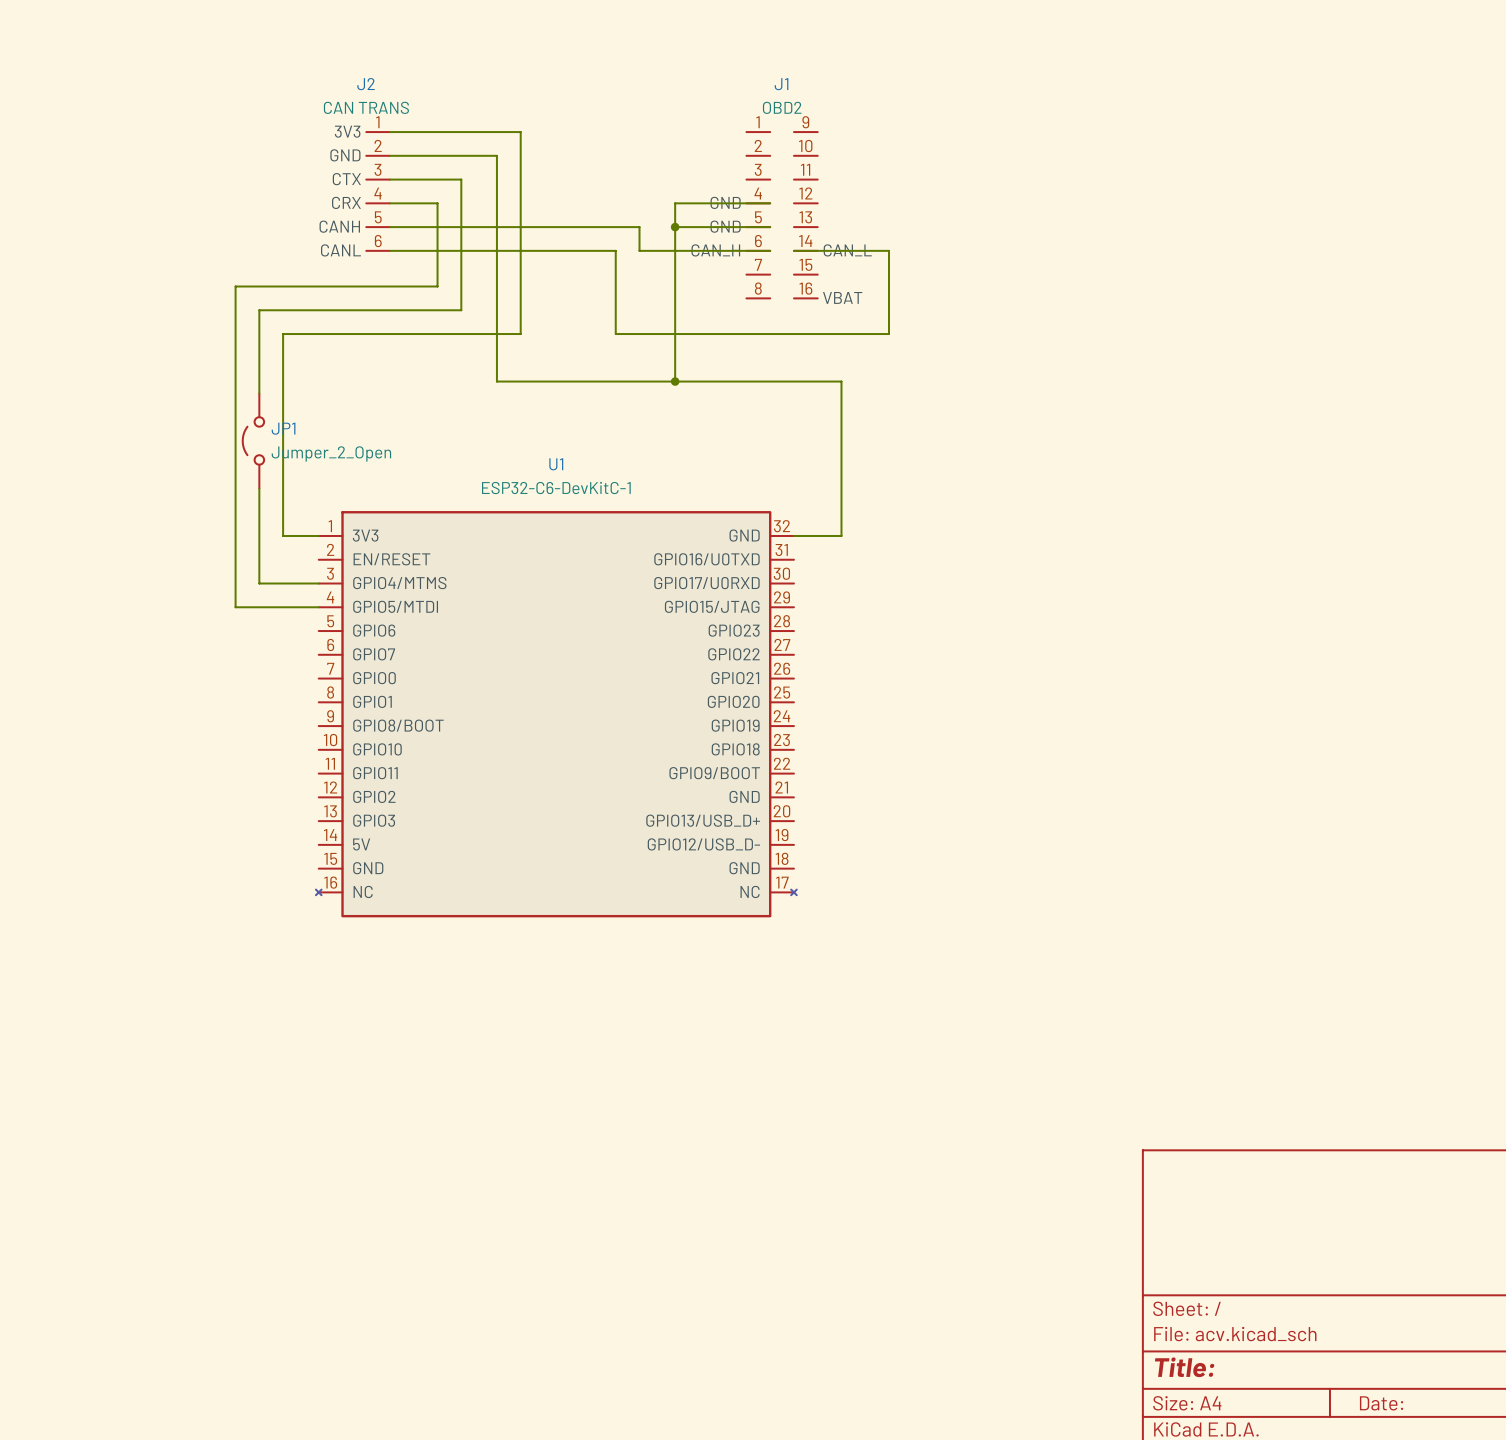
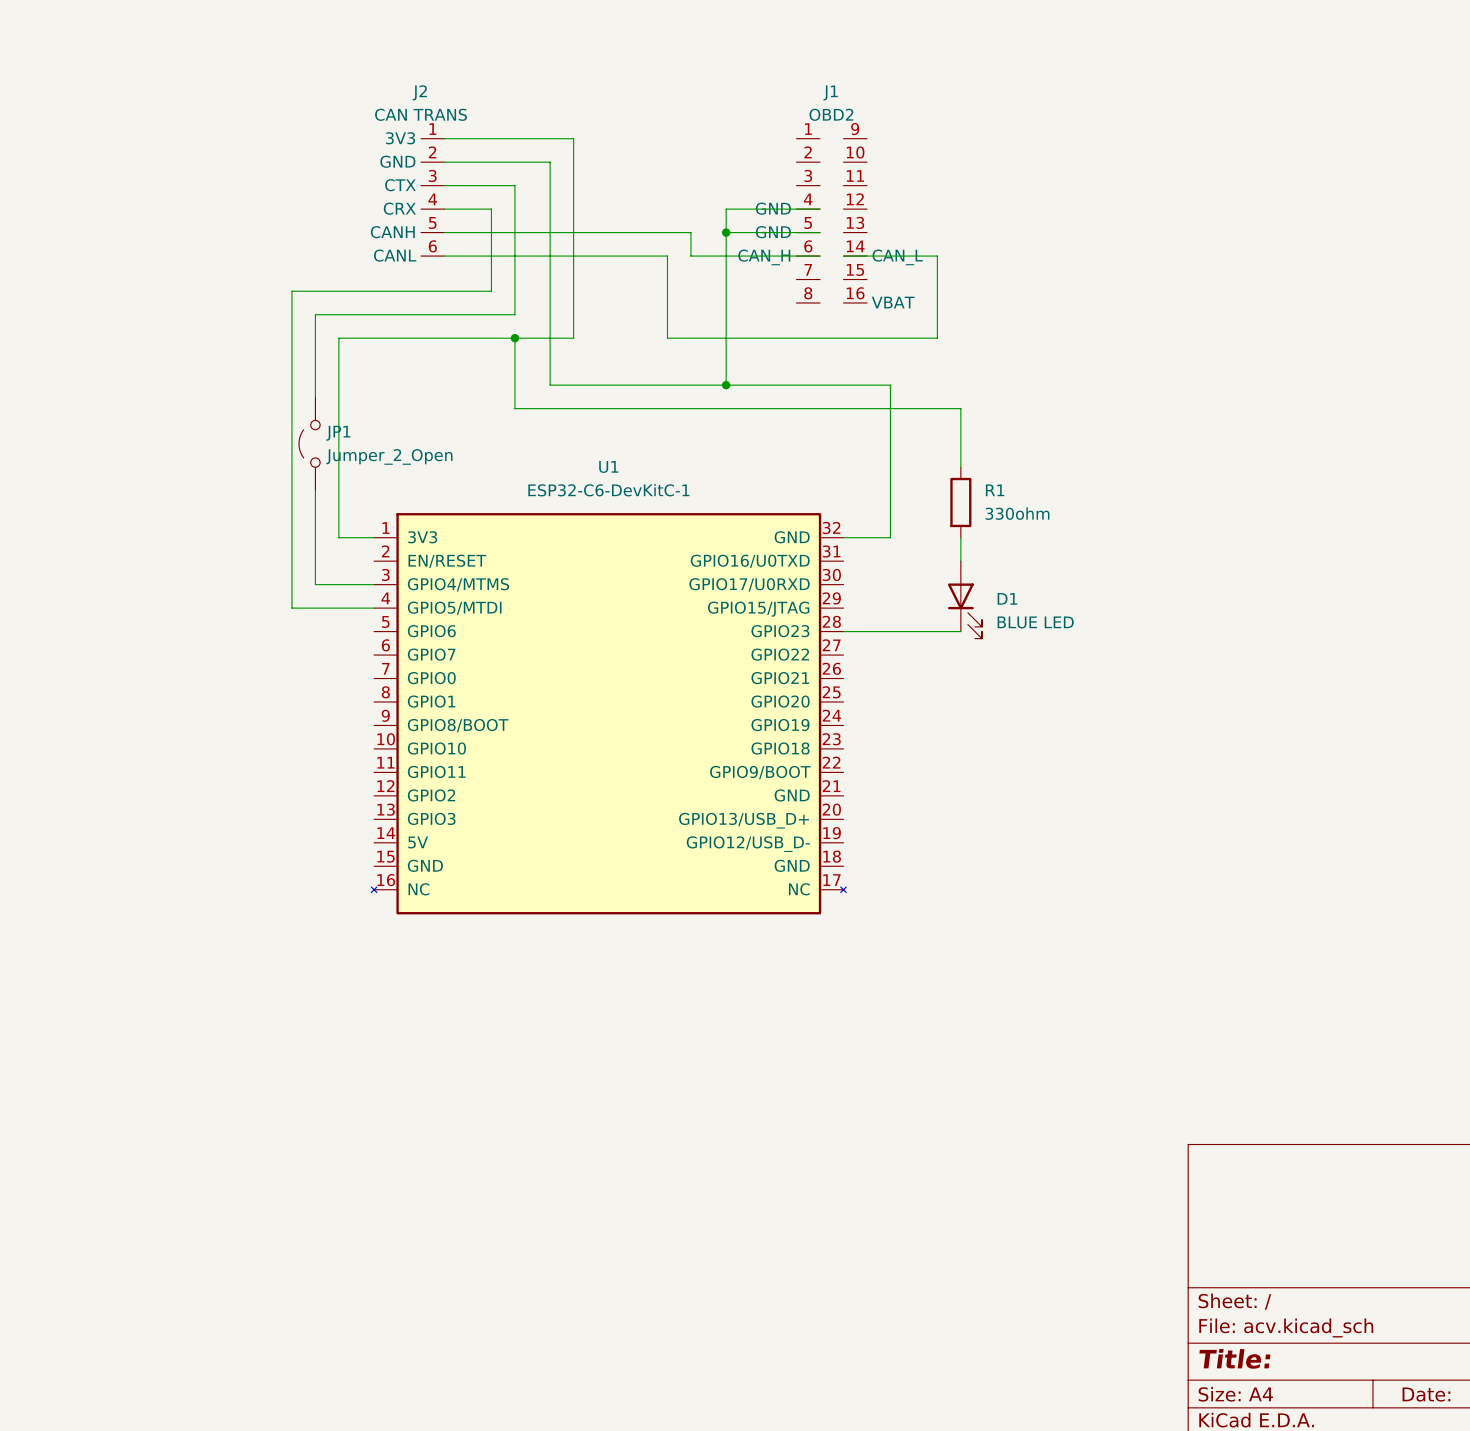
wire: none -> (514, 338) (514, 408) (960, 408) (960, 467)
junction: none -> (514, 338)
R1: none -> 330ohm (960, 502)
wire: none -> (960, 537) (960, 561)
D1: none -> BLUE LED (964, 599)
wire: none -> (843, 631) (960, 631)

